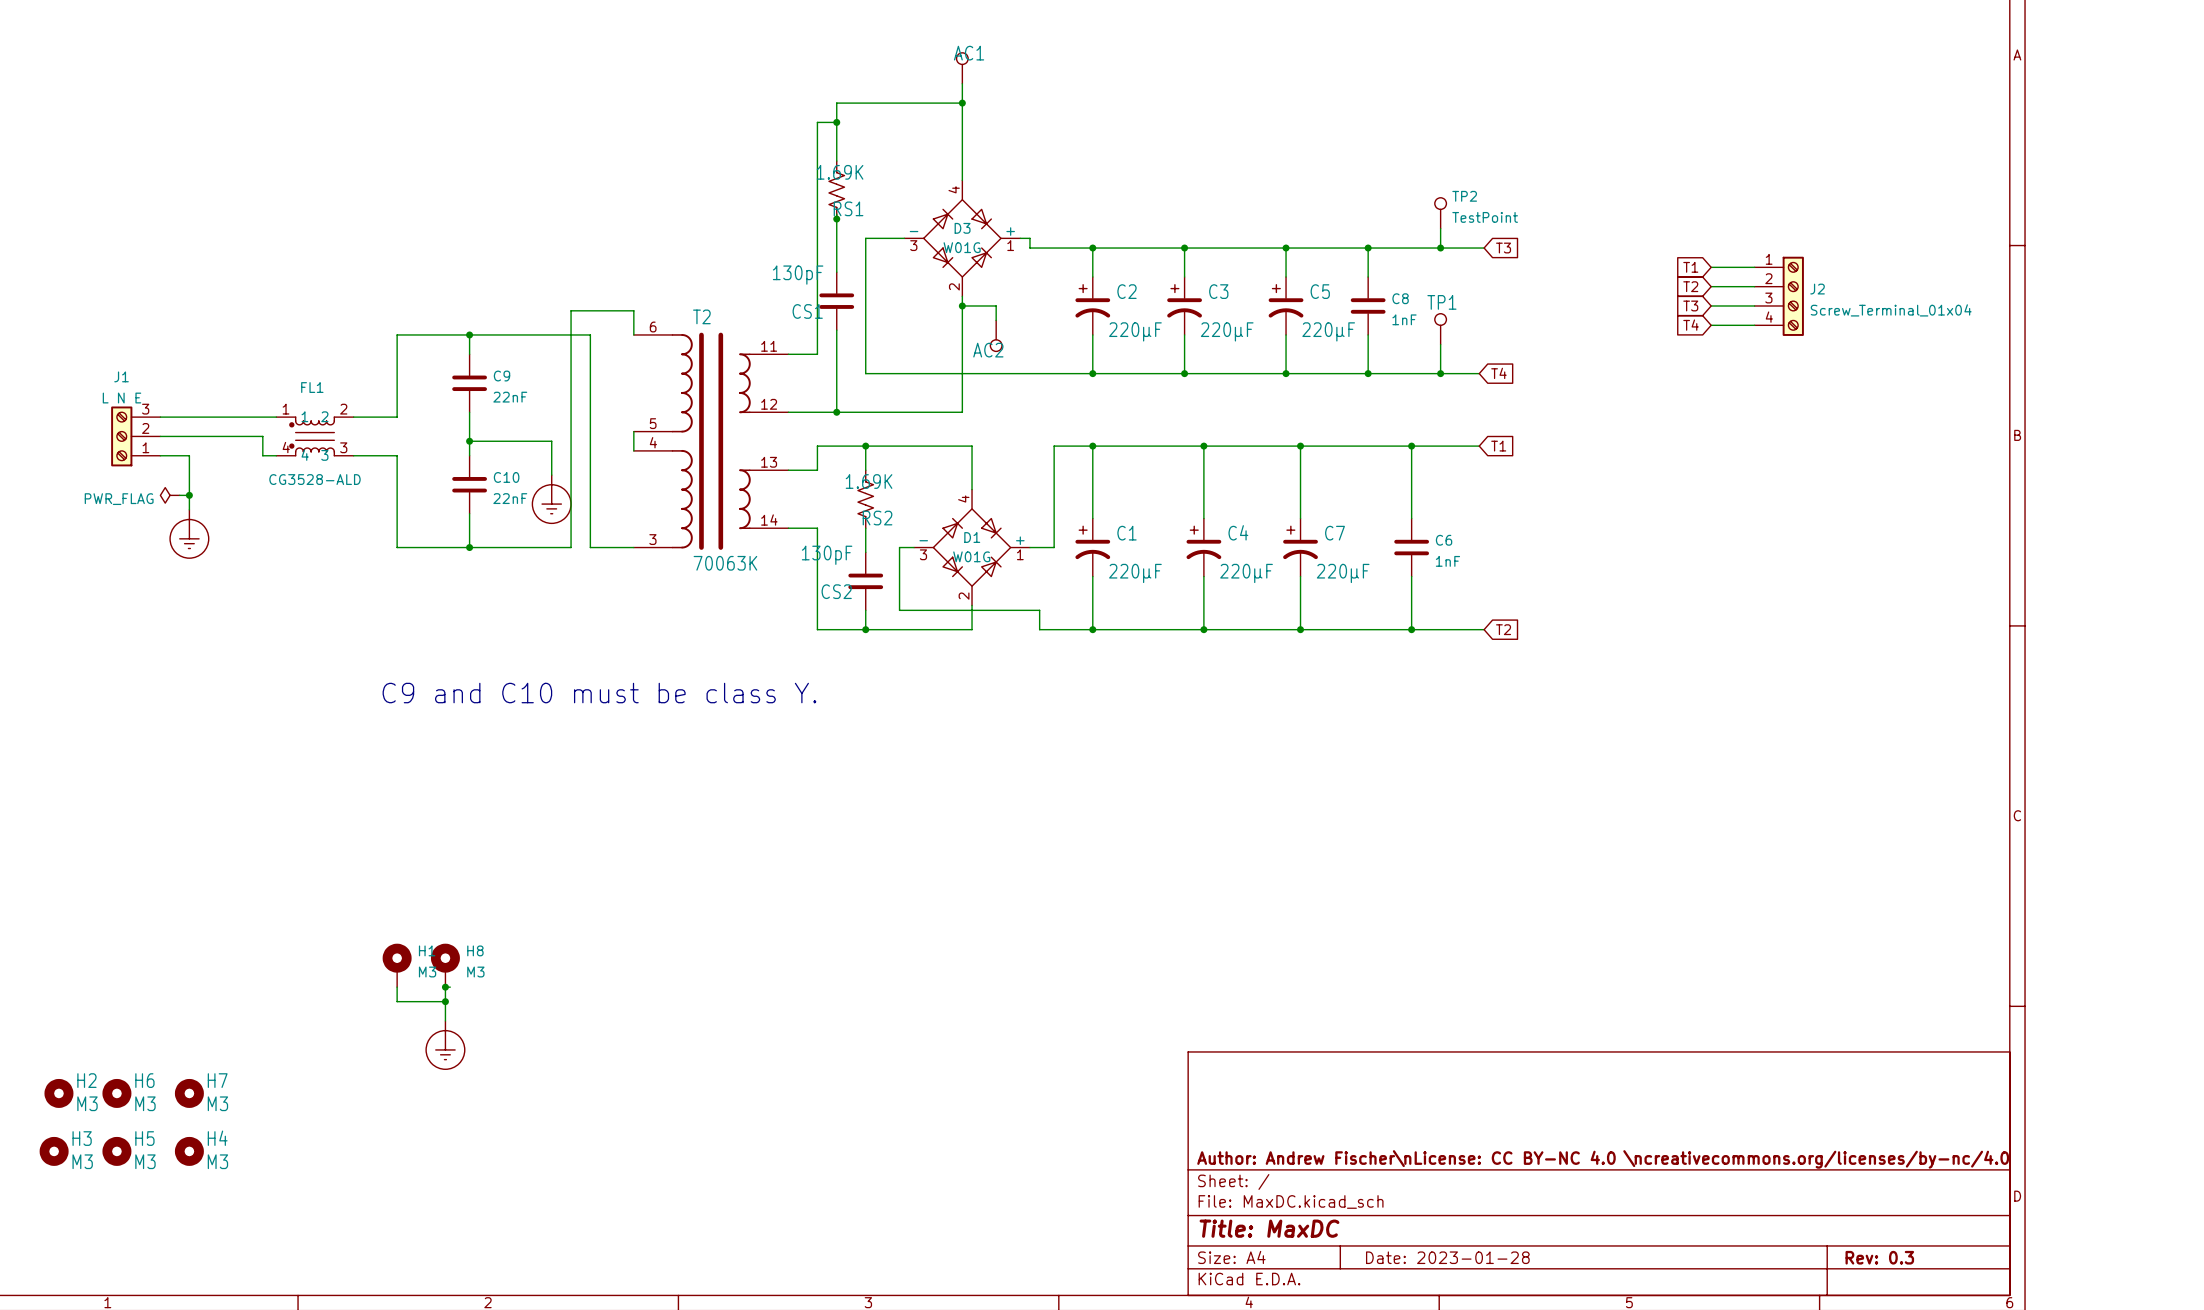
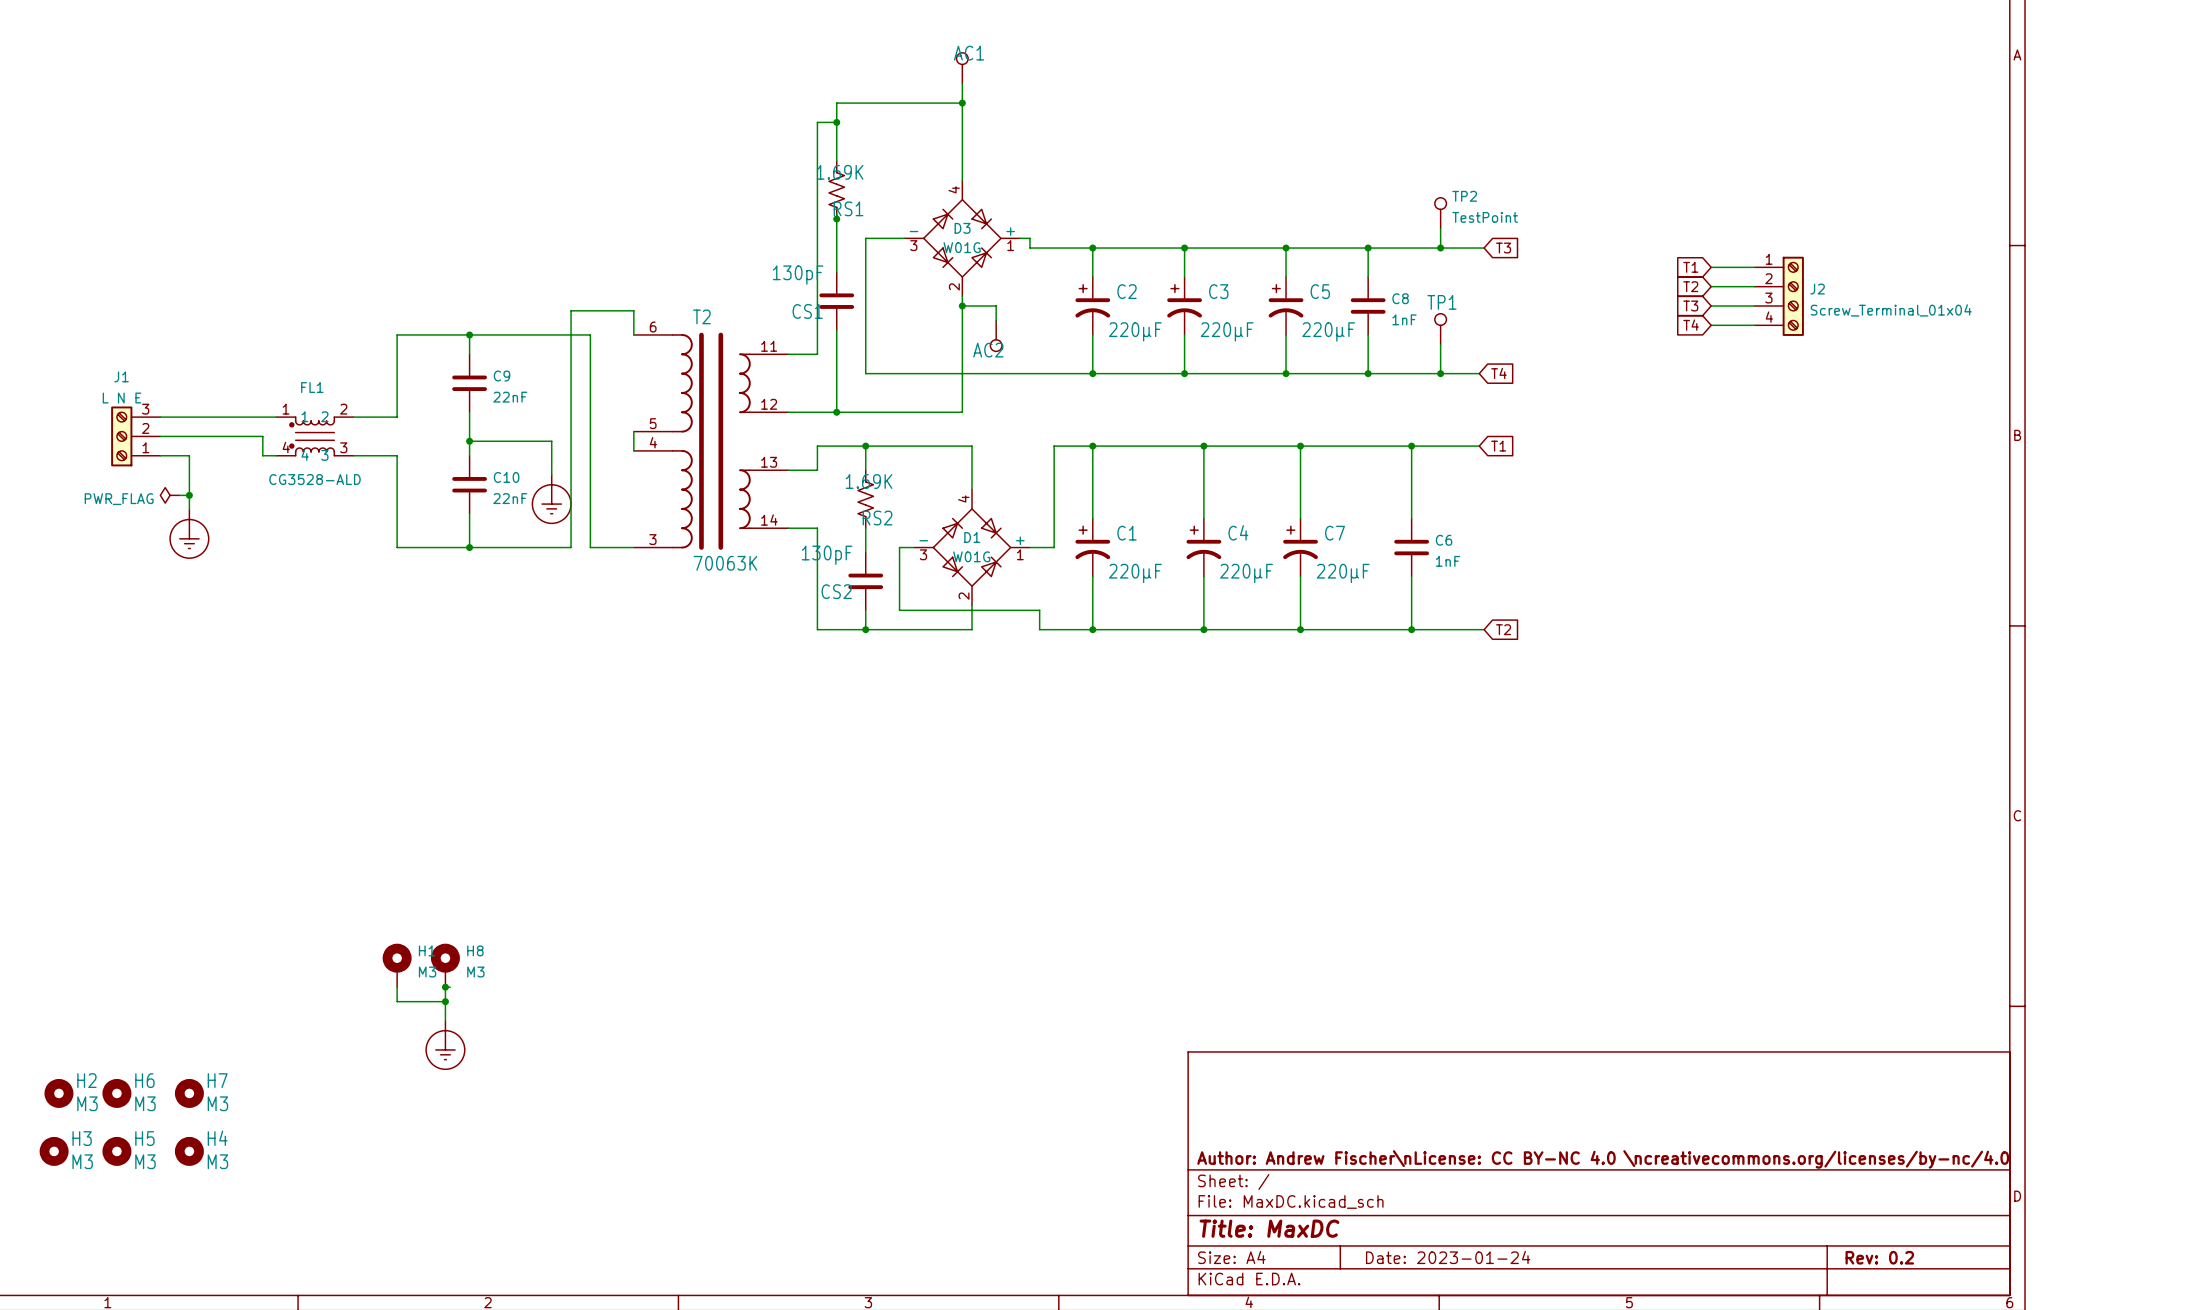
text: C9 and C10 must be class Y. (599, 693) -> none
title block: Date: 2023-01-28 (1447, 1257) -> Date: 2023-01-24 (1448, 1257)
title block: Rev: 0.3 (1879, 1257) -> Rev: 0.2 (1879, 1257)

